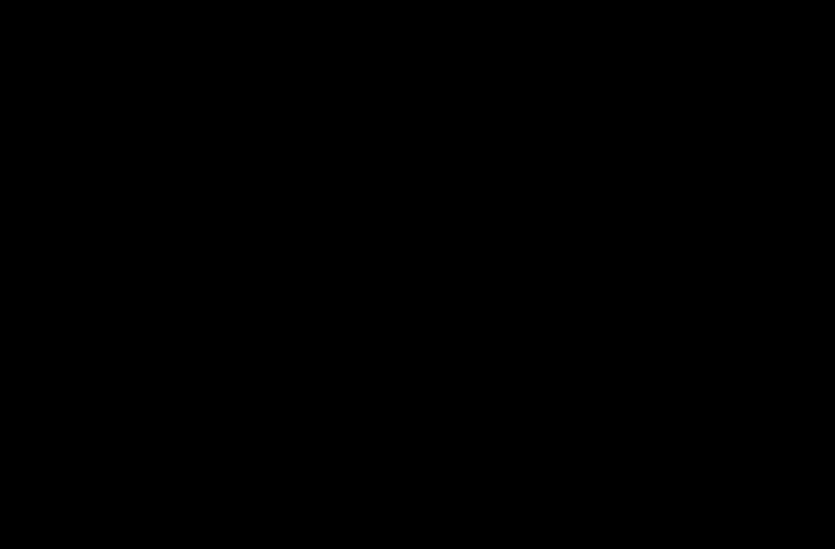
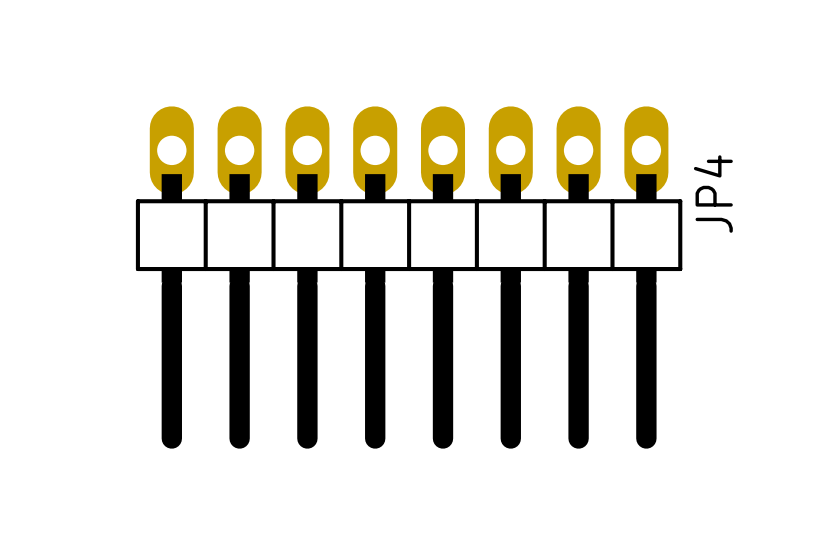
JP4: none -> (409, 277)

